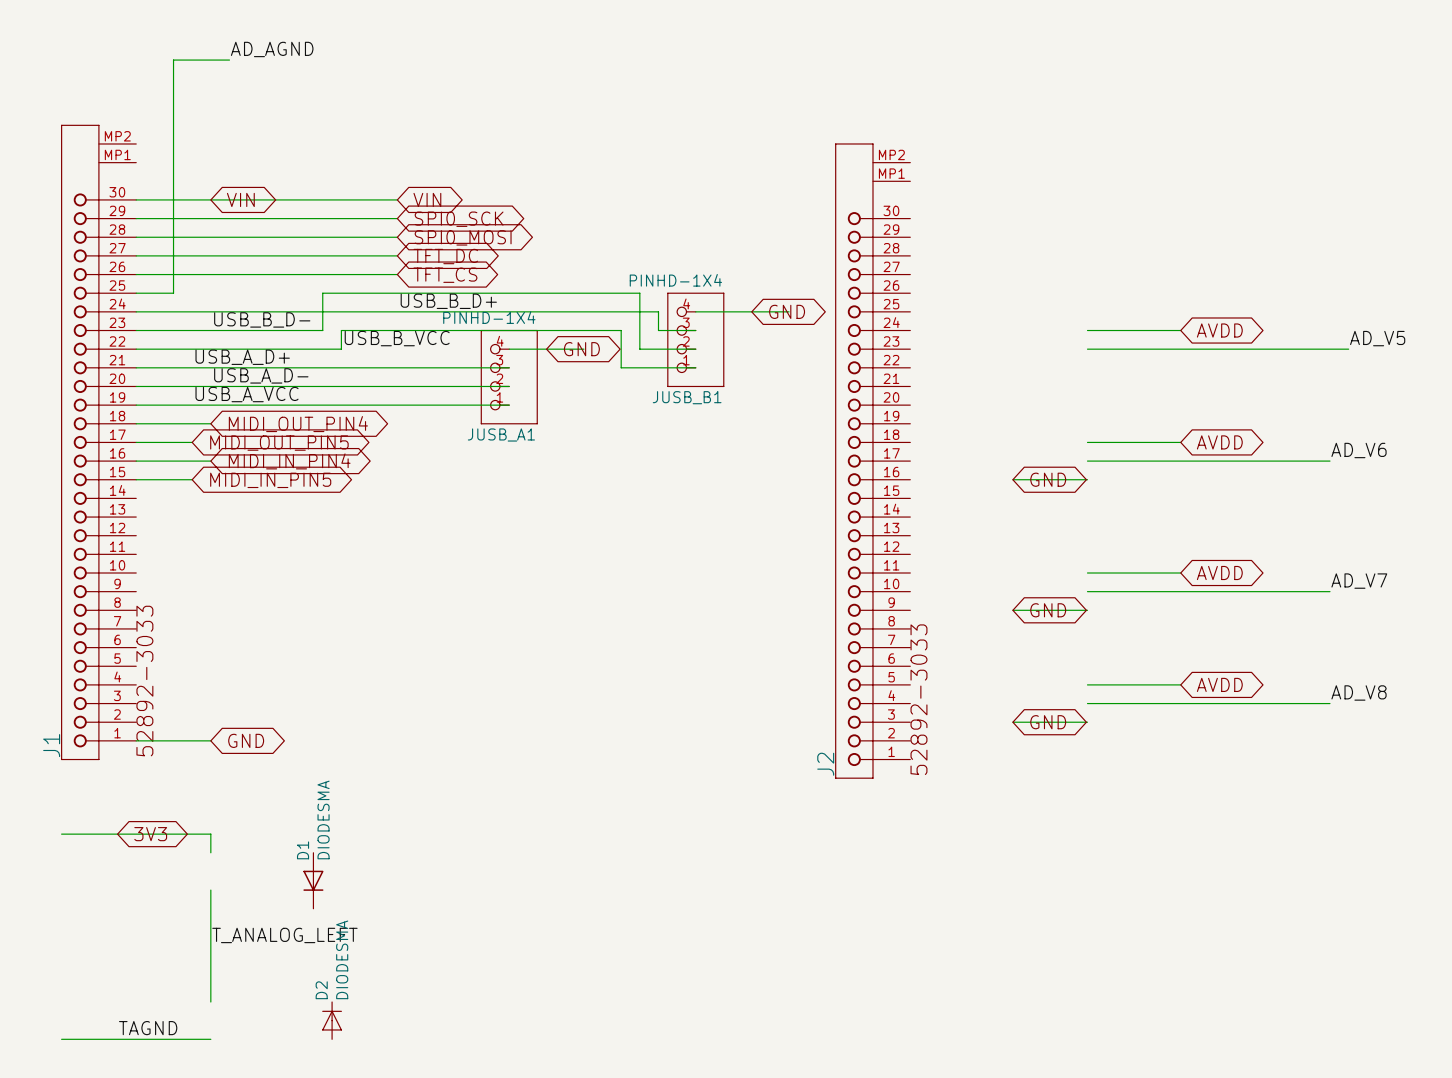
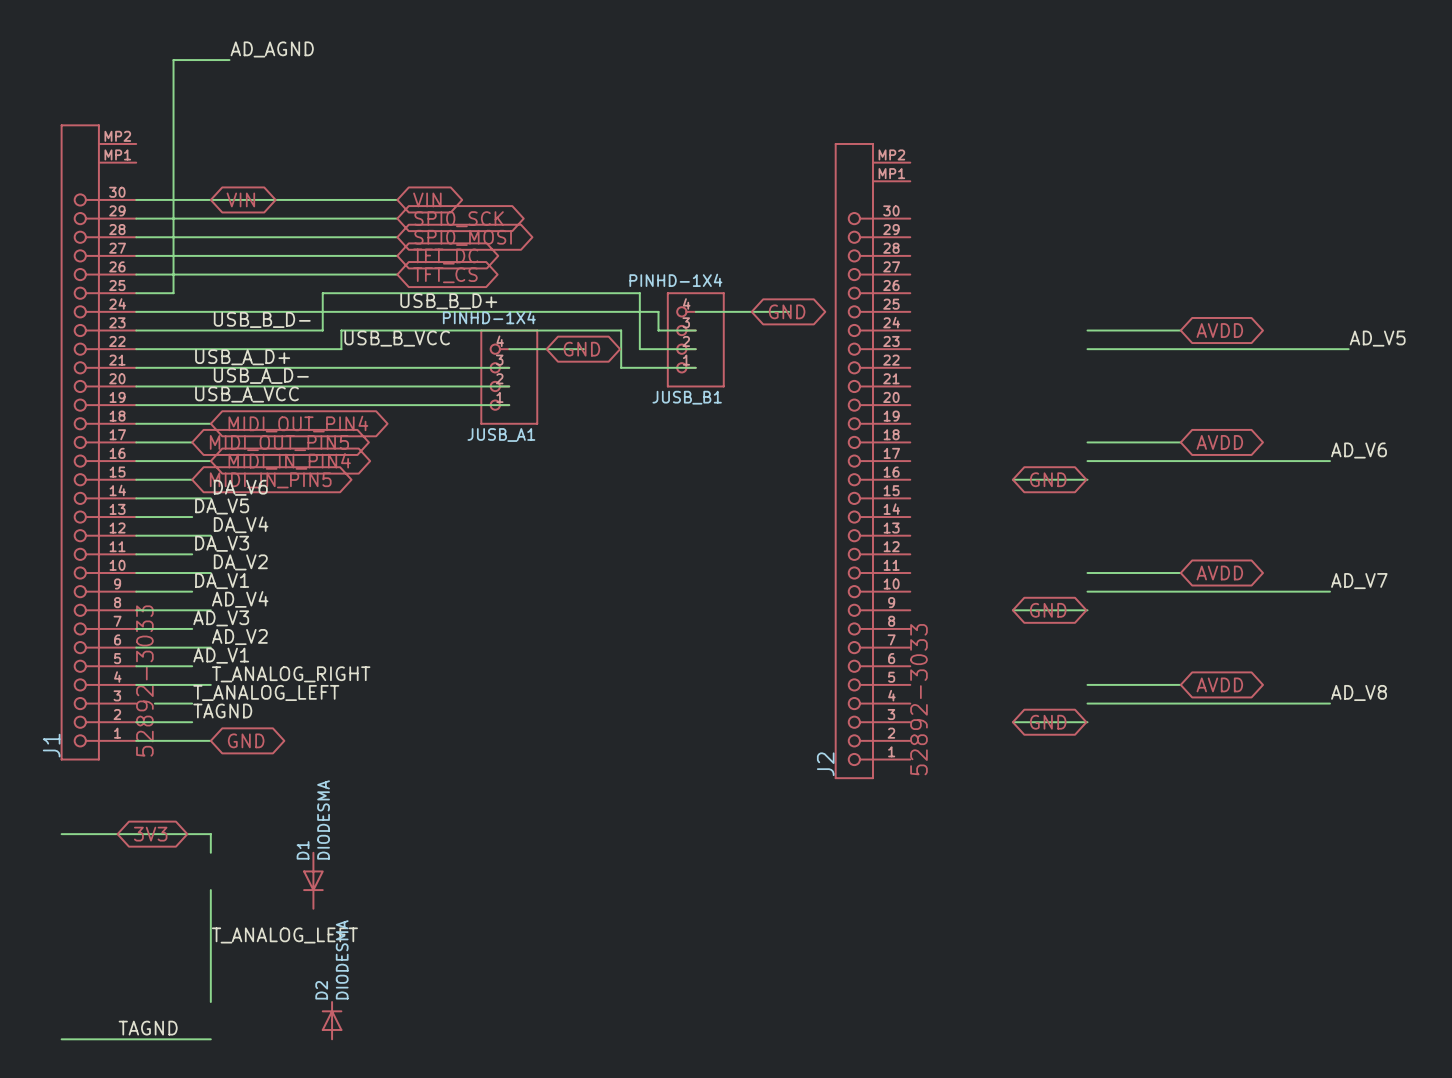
label: none -> DA_V6 (240, 487)
wire: none -> (136, 498) (210, 498)
label: none -> DA_V5 (222, 506)
wire: none -> (136, 517) (192, 517)
label: none -> DA_V4 (241, 524)
wire: none -> (136, 535) (210, 535)
label: none -> DA_V3 (222, 543)
wire: none -> (136, 554) (192, 554)
label: none -> DA_V2 (240, 562)
wire: none -> (136, 573) (210, 573)
label: none -> DA_V1 (222, 581)
wire: none -> (136, 591) (192, 591)
label: none -> AD_V4 (240, 599)
wire: none -> (136, 610) (210, 610)
label: none -> AD_V3 (221, 618)
wire: none -> (136, 628) (192, 628)
label: none -> AD_V2 (239, 637)
wire: none -> (136, 647) (210, 647)
label: none -> AD_V1 (221, 655)
wire: none -> (136, 666) (192, 666)
label: none -> T_ANALOG_RIGHT (291, 674)
wire: none -> (136, 684) (210, 684)
label: none -> T_ANALOG_LEFT (266, 692)
wire: none -> (154, 703) (192, 703)
label: none -> TAGND (222, 711)
wire: none -> (136, 722) (192, 722)

